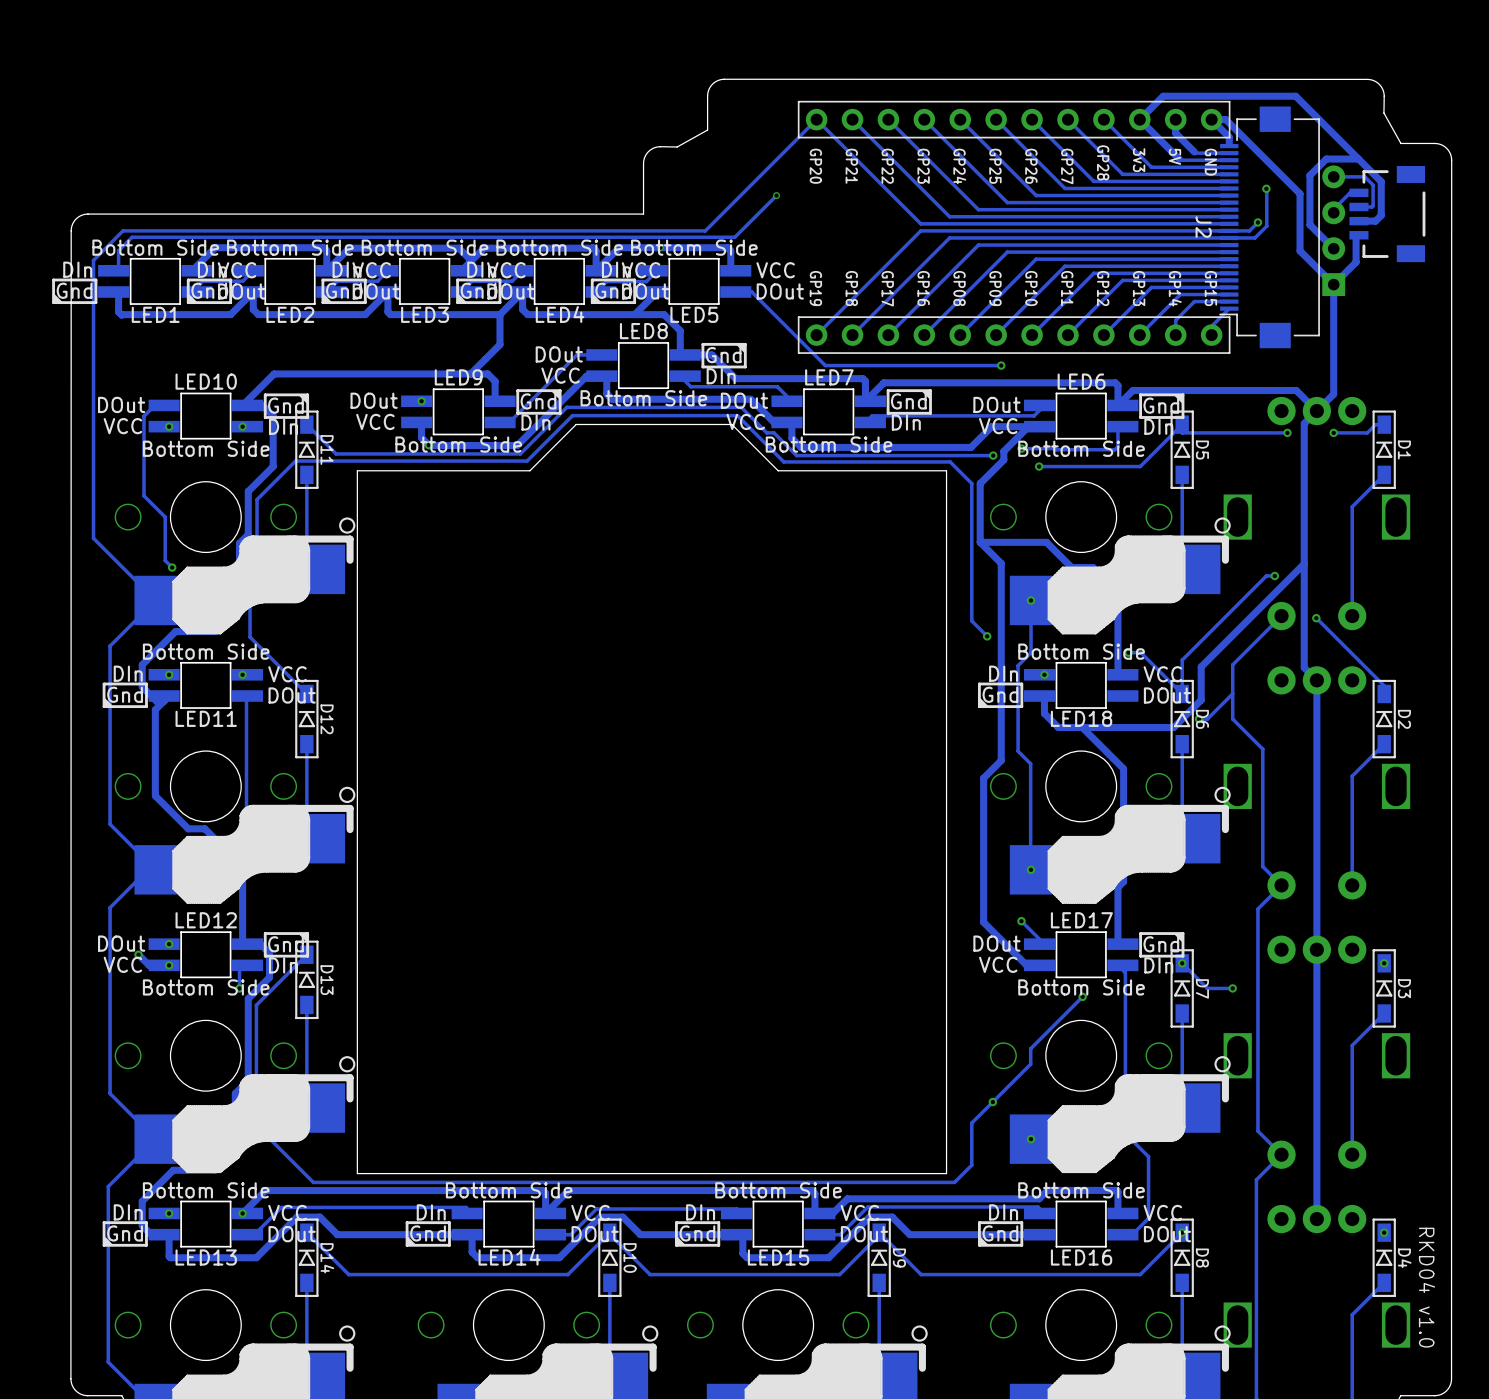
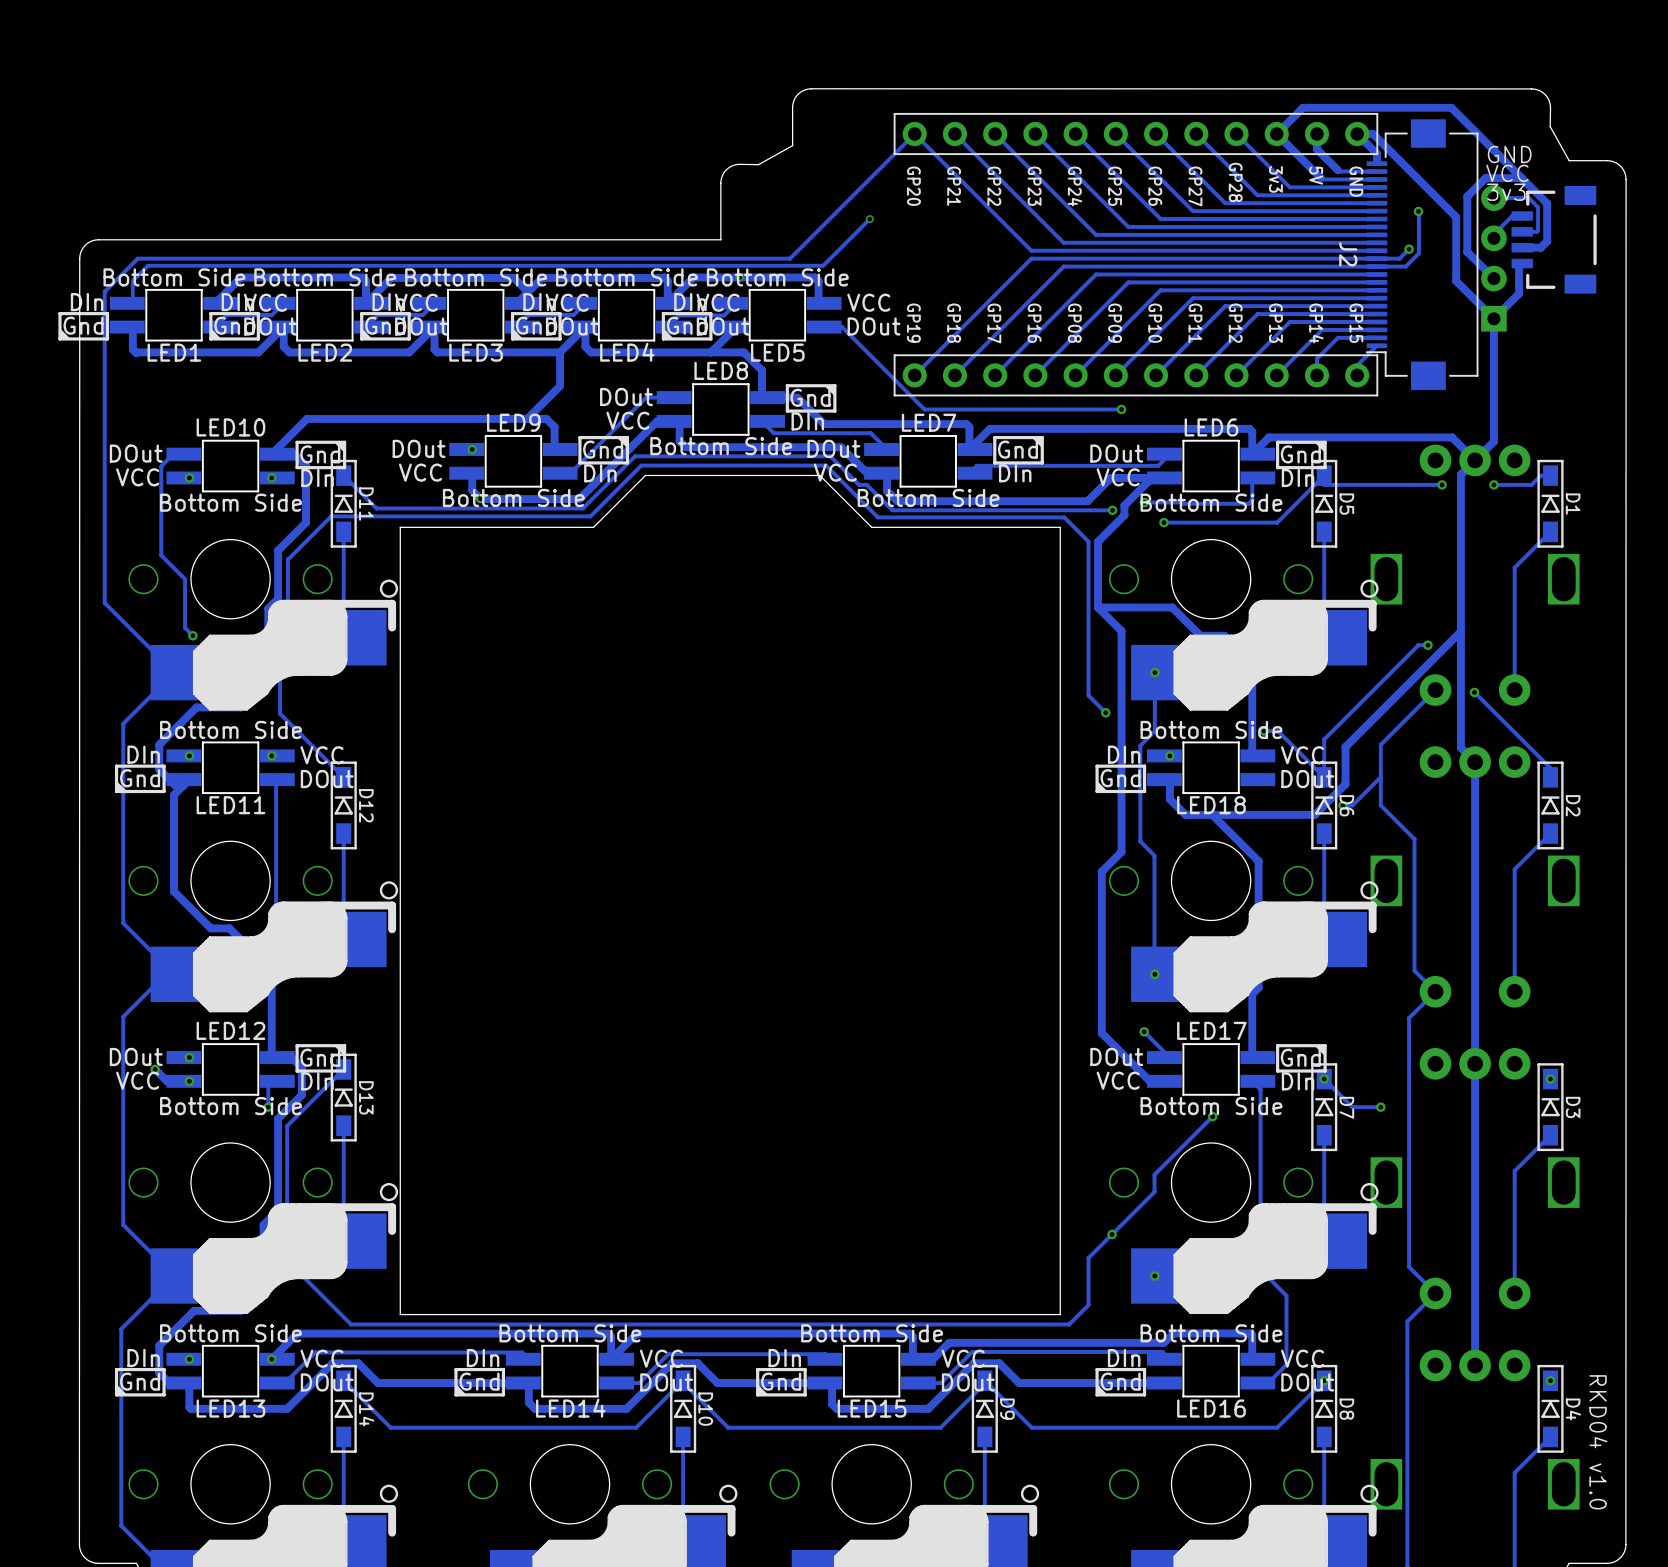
text: none -> GND (1509, 154)
text: none -> VCC (1507, 173)
text: none -> 3v3 (1506, 192)

